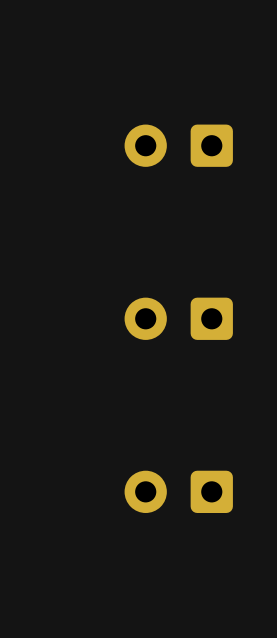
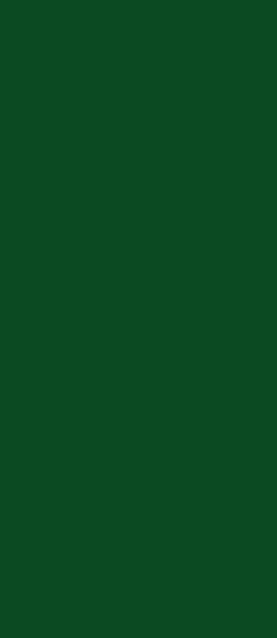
part: (178, 145) -> none
part: (178, 318) -> none
part: (178, 491) -> none

